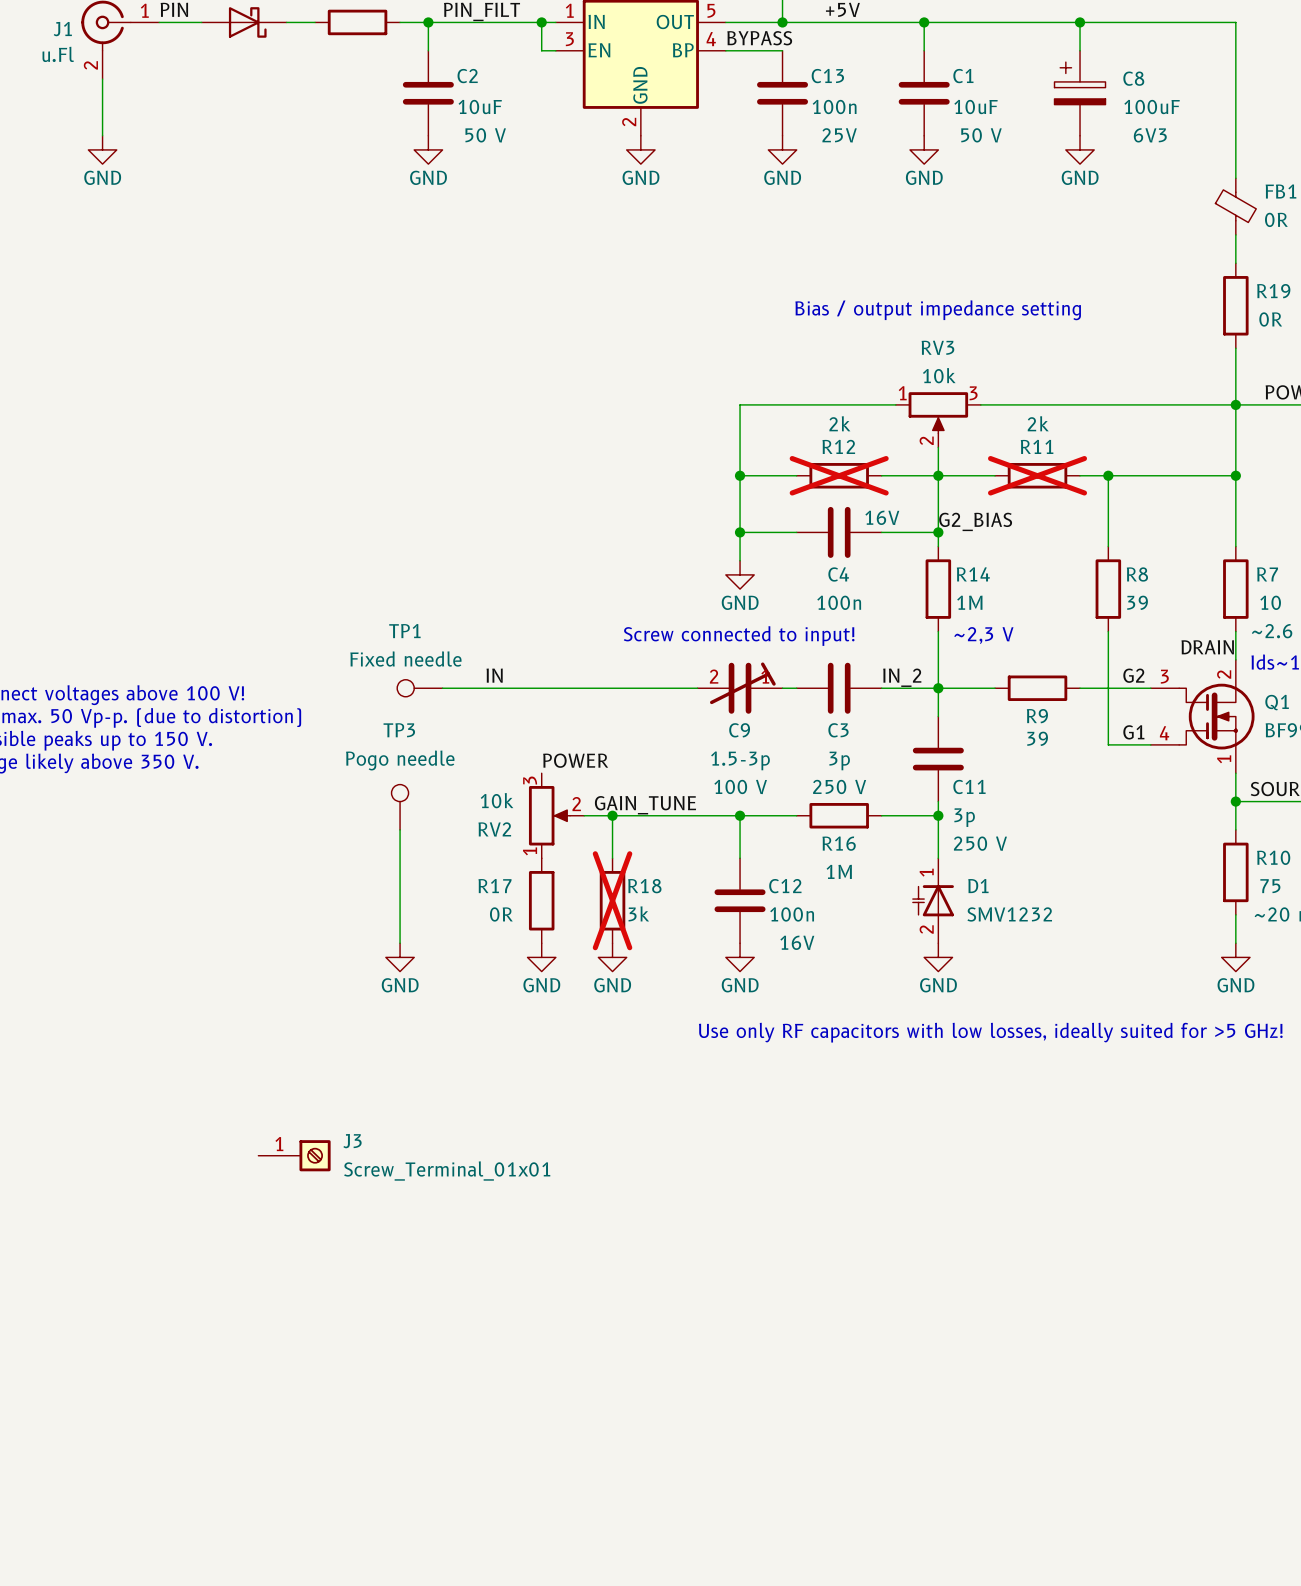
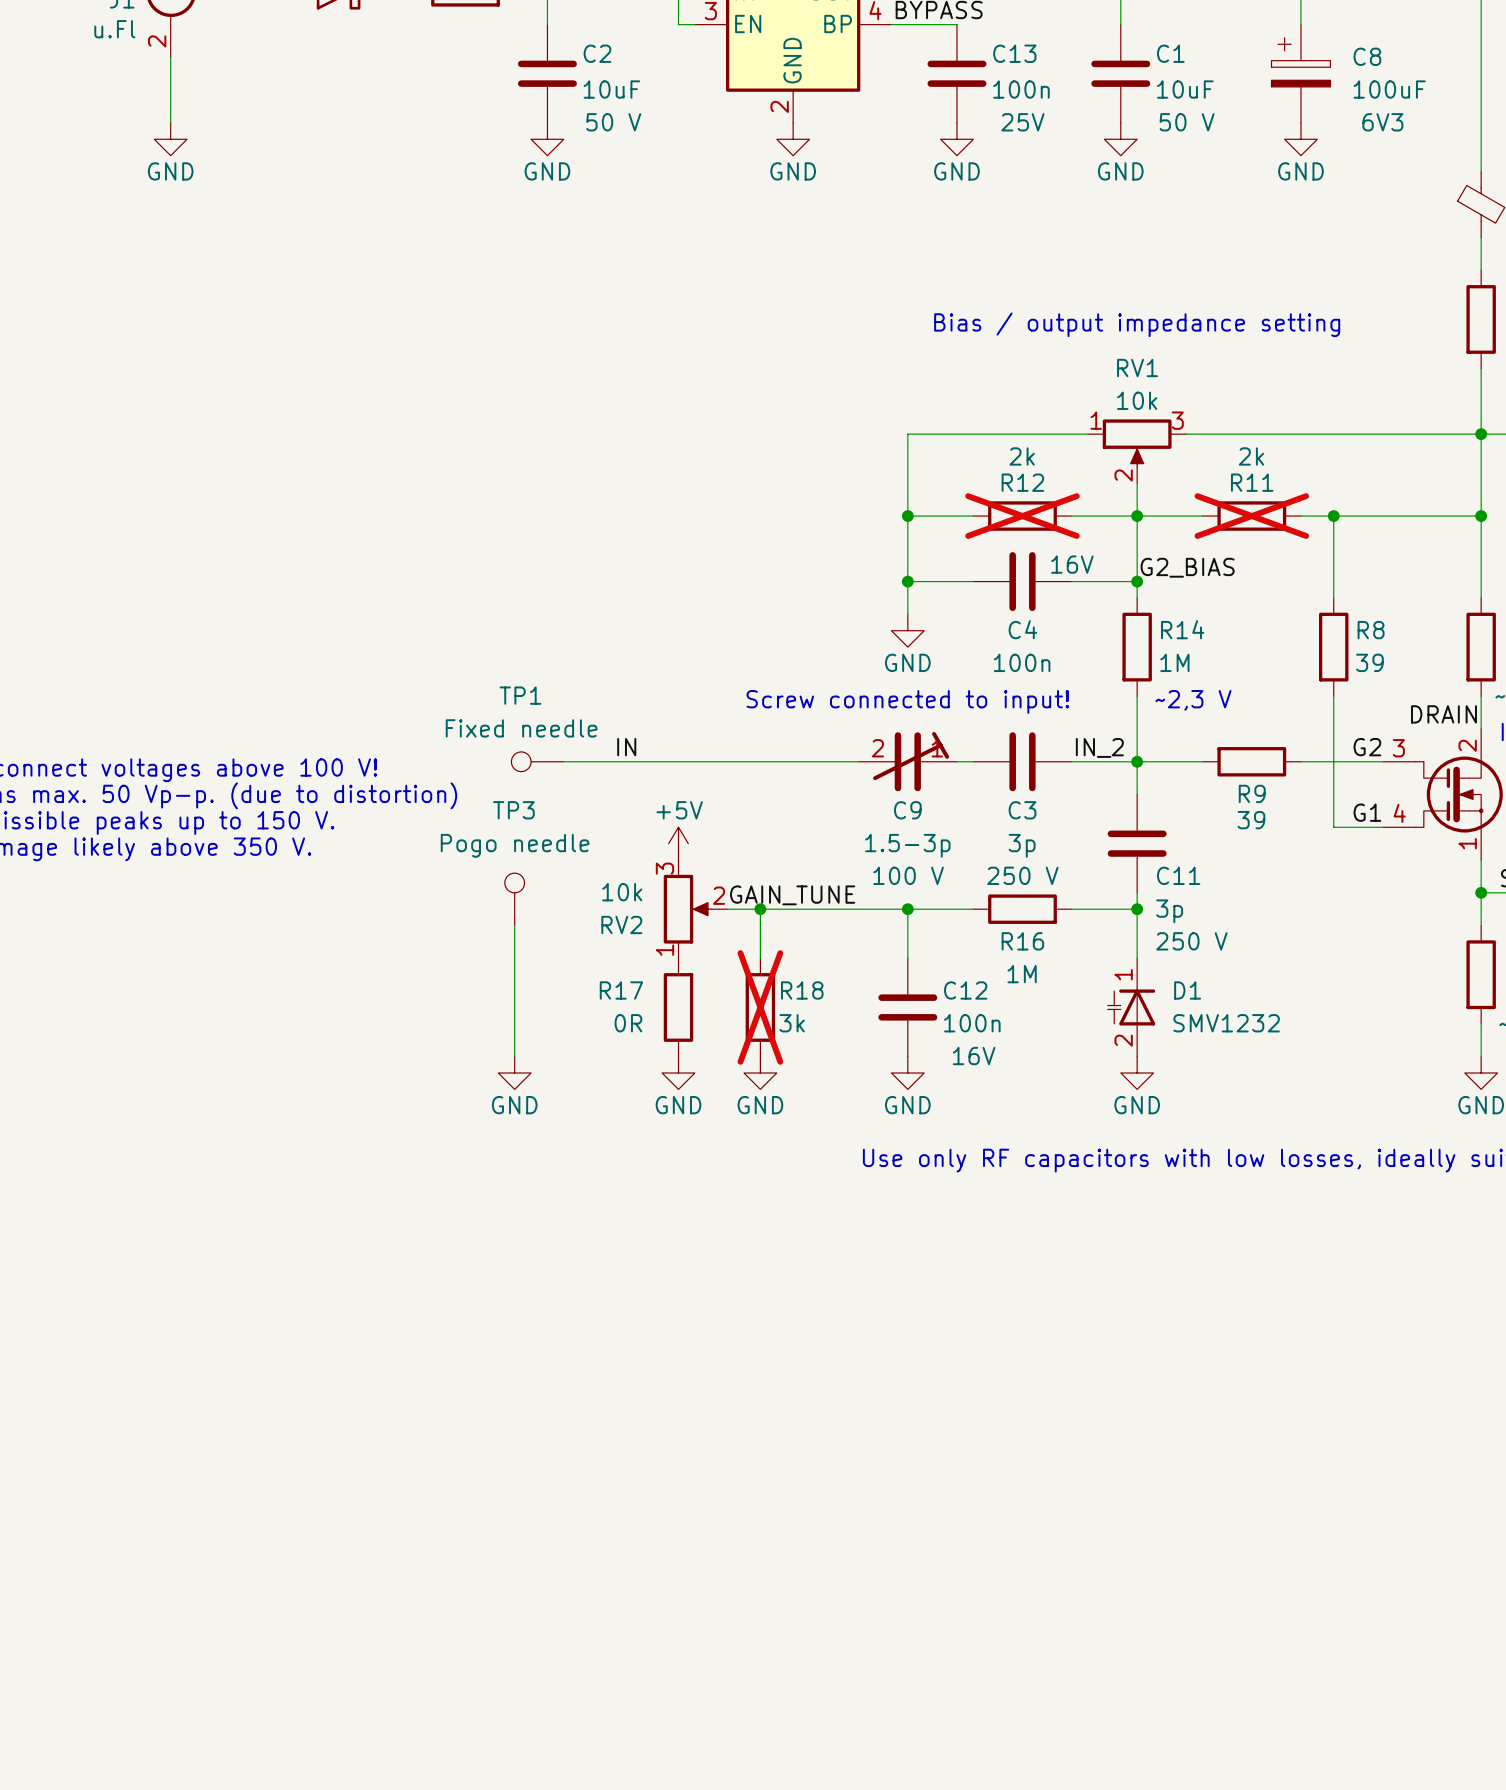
RV3 name: RV3 (937, 347) -> RV1 (1137, 368)
power symbol: none -> +5V (678, 843)
label: POWER (575, 760) -> none
J3: Screw_Terminal_01x01 (294, 1155) -> none

